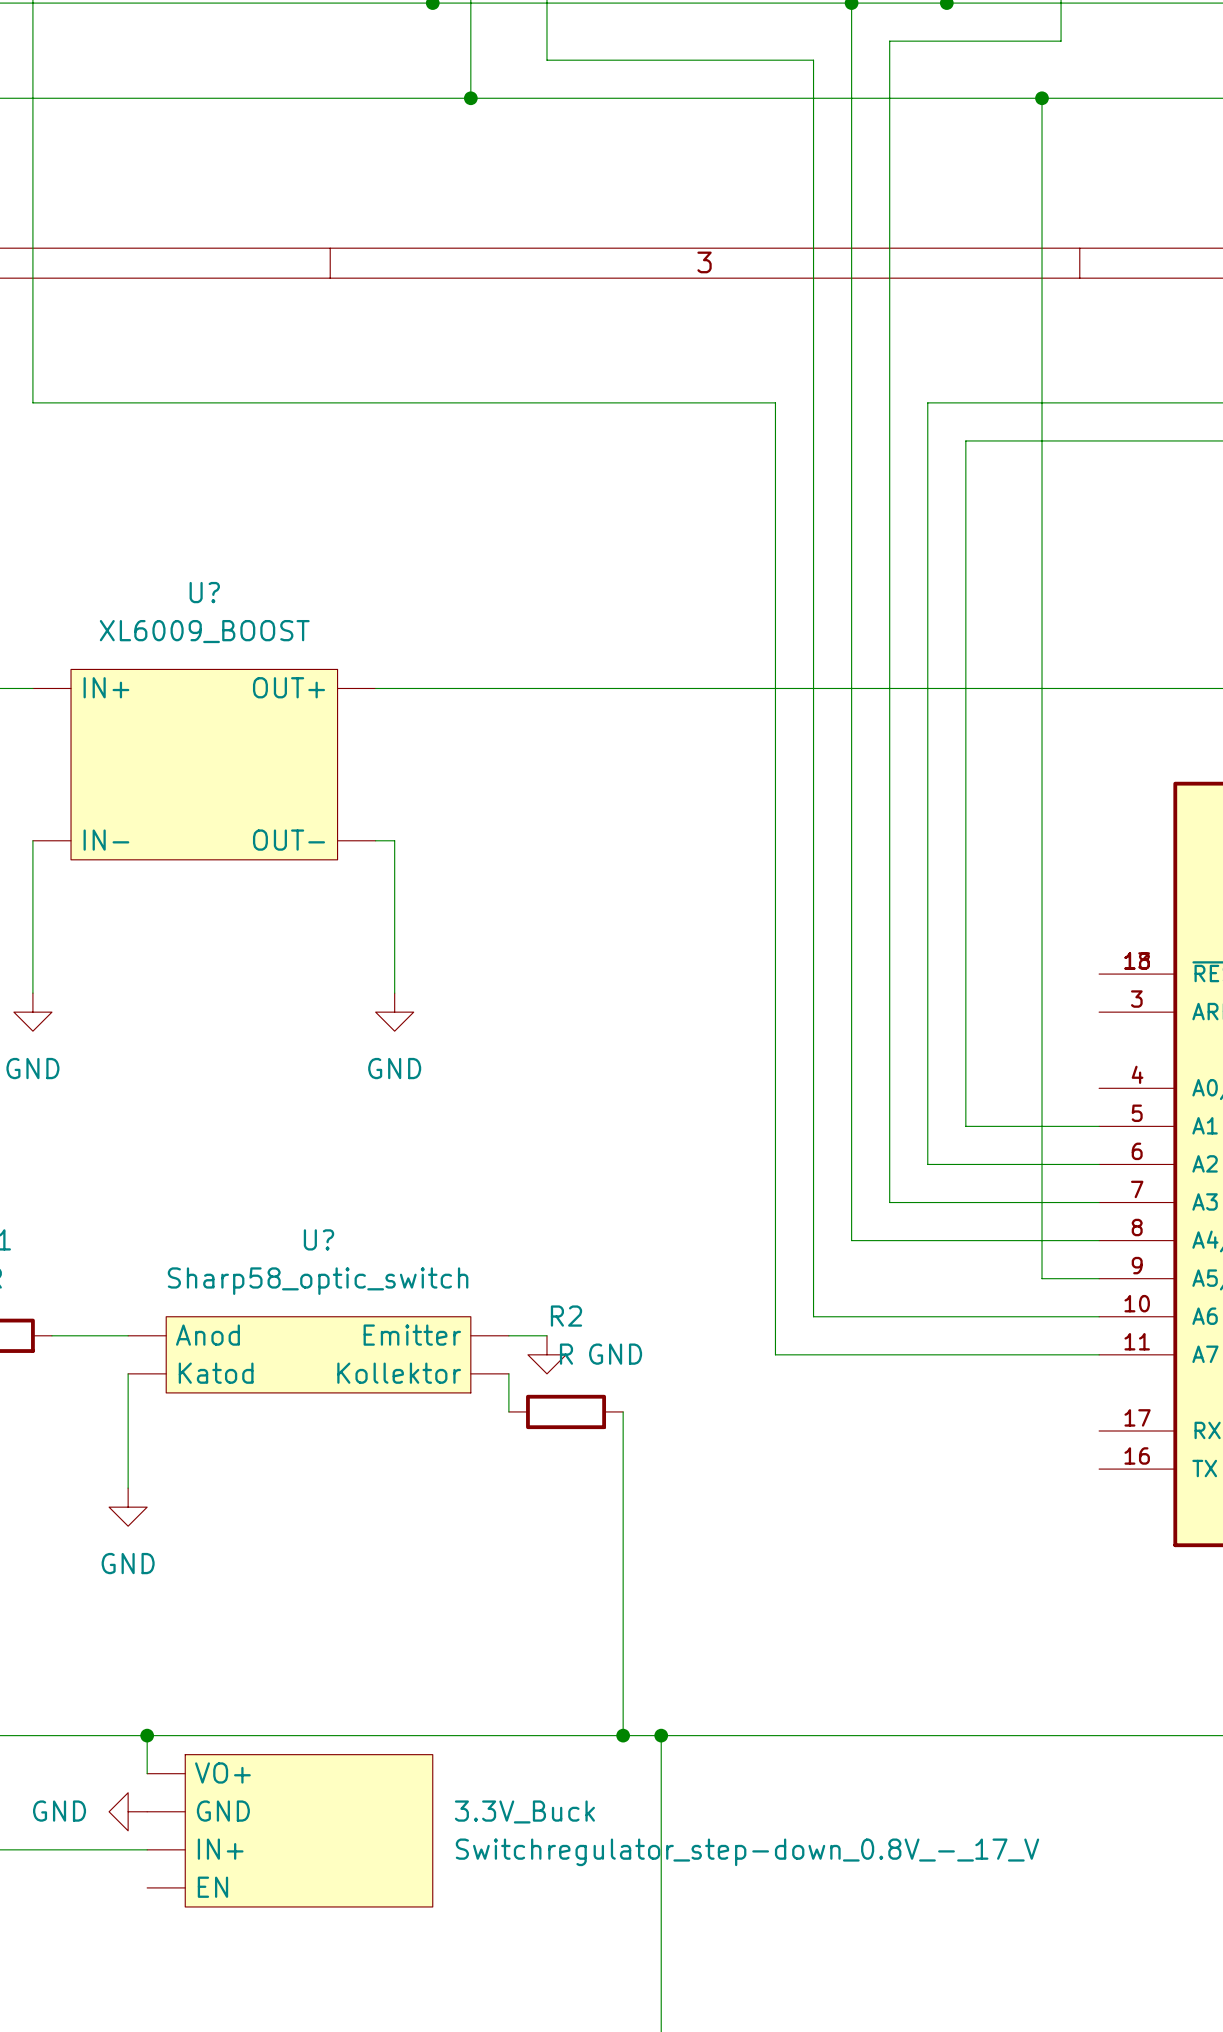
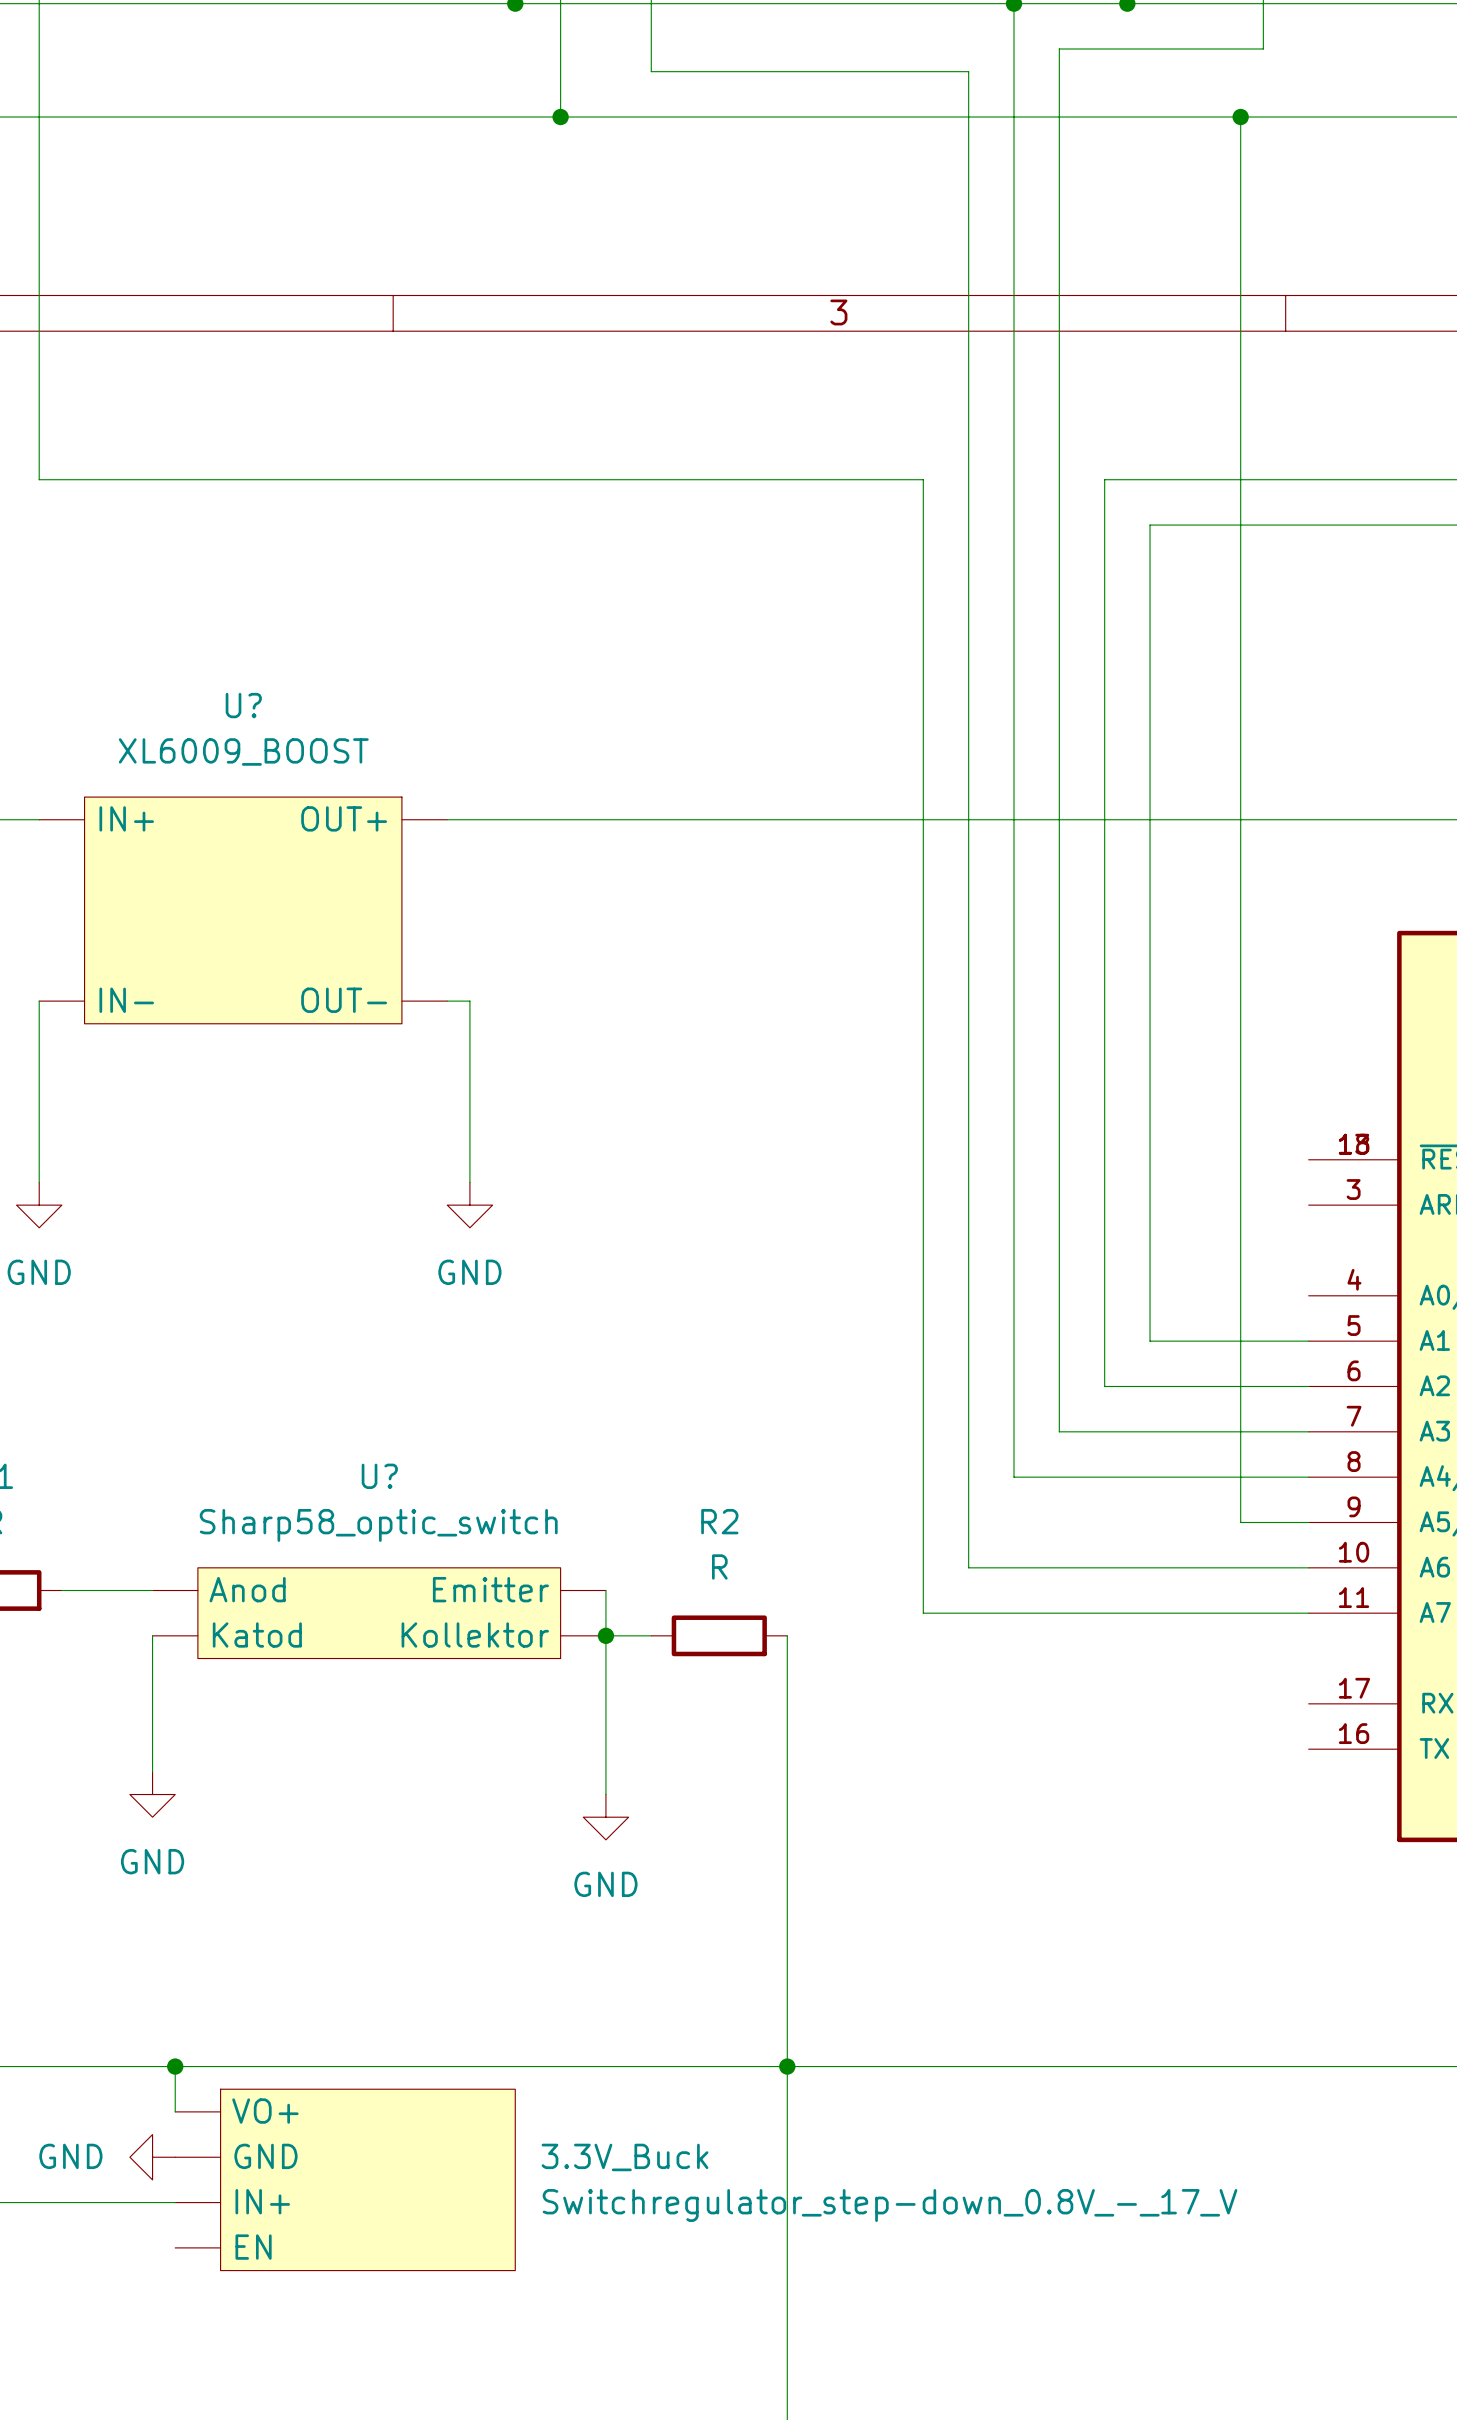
wire: (508, 1335) (546, 1335) -> (605, 1590) (605, 1635) (651, 1635)
power symbol position: GND (546, 1354) -> GND (605, 1817)
power symbol text position: GND (615, 1354) -> GND (605, 1884)
junction: none -> (605, 1635)
wire: none -> (787, 1635) (787, 2066)
wire: none -> (605, 1681) (605, 1794)
R2 position: (566, 1411) -> (719, 1635)
wire: (623, 1411) (623, 1735) -> none
junction: (623, 1735) -> none

